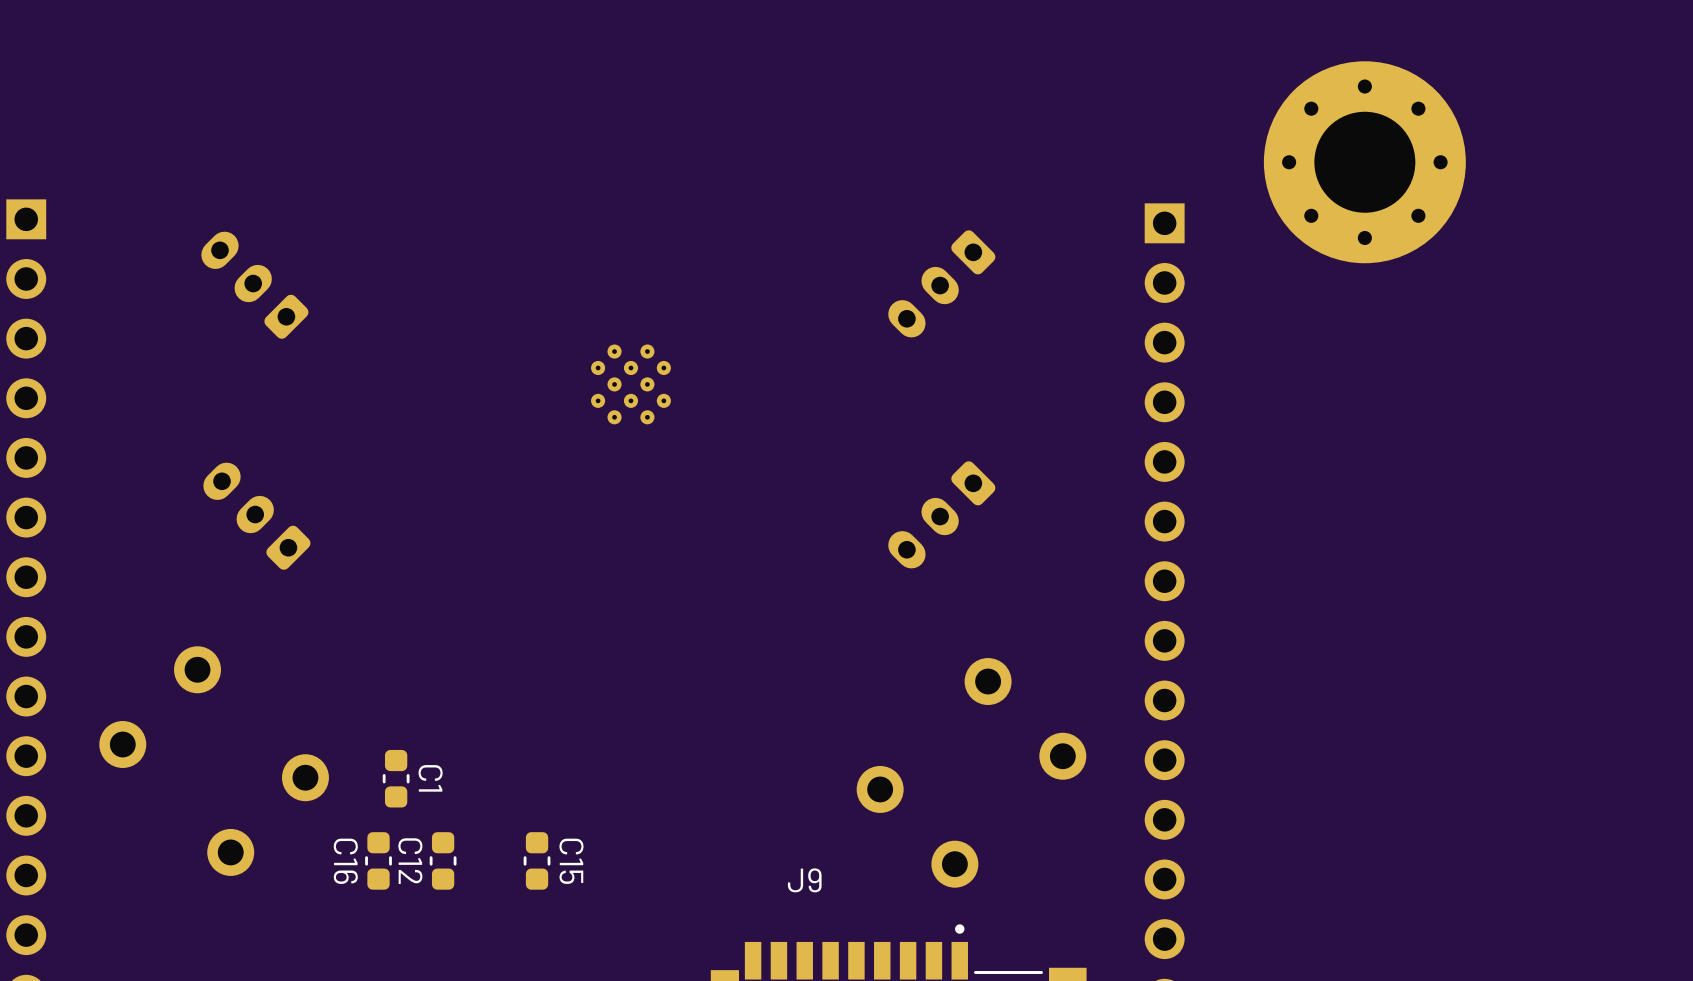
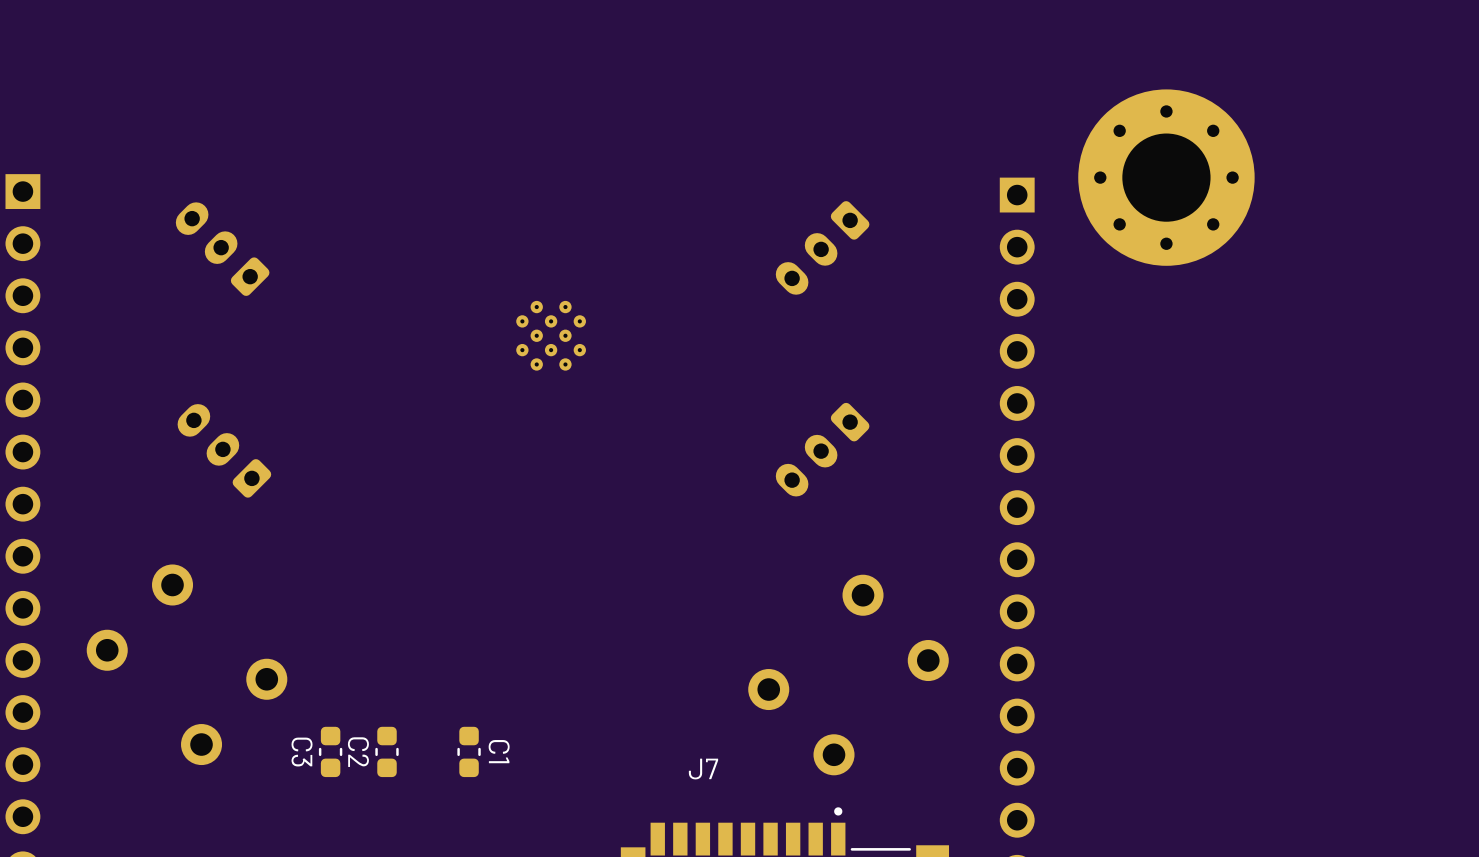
part position: (1364, 162) -> (1166, 177)
C1: (396, 778) -> none
C16 name: C16 (345, 861) -> C3 (302, 752)
C12 name: C12 (410, 861) -> C2 (358, 752)
C15 name: C15 (571, 861) -> C1 (499, 751)
J9 name: J9 (804, 880) -> J7 (703, 769)

